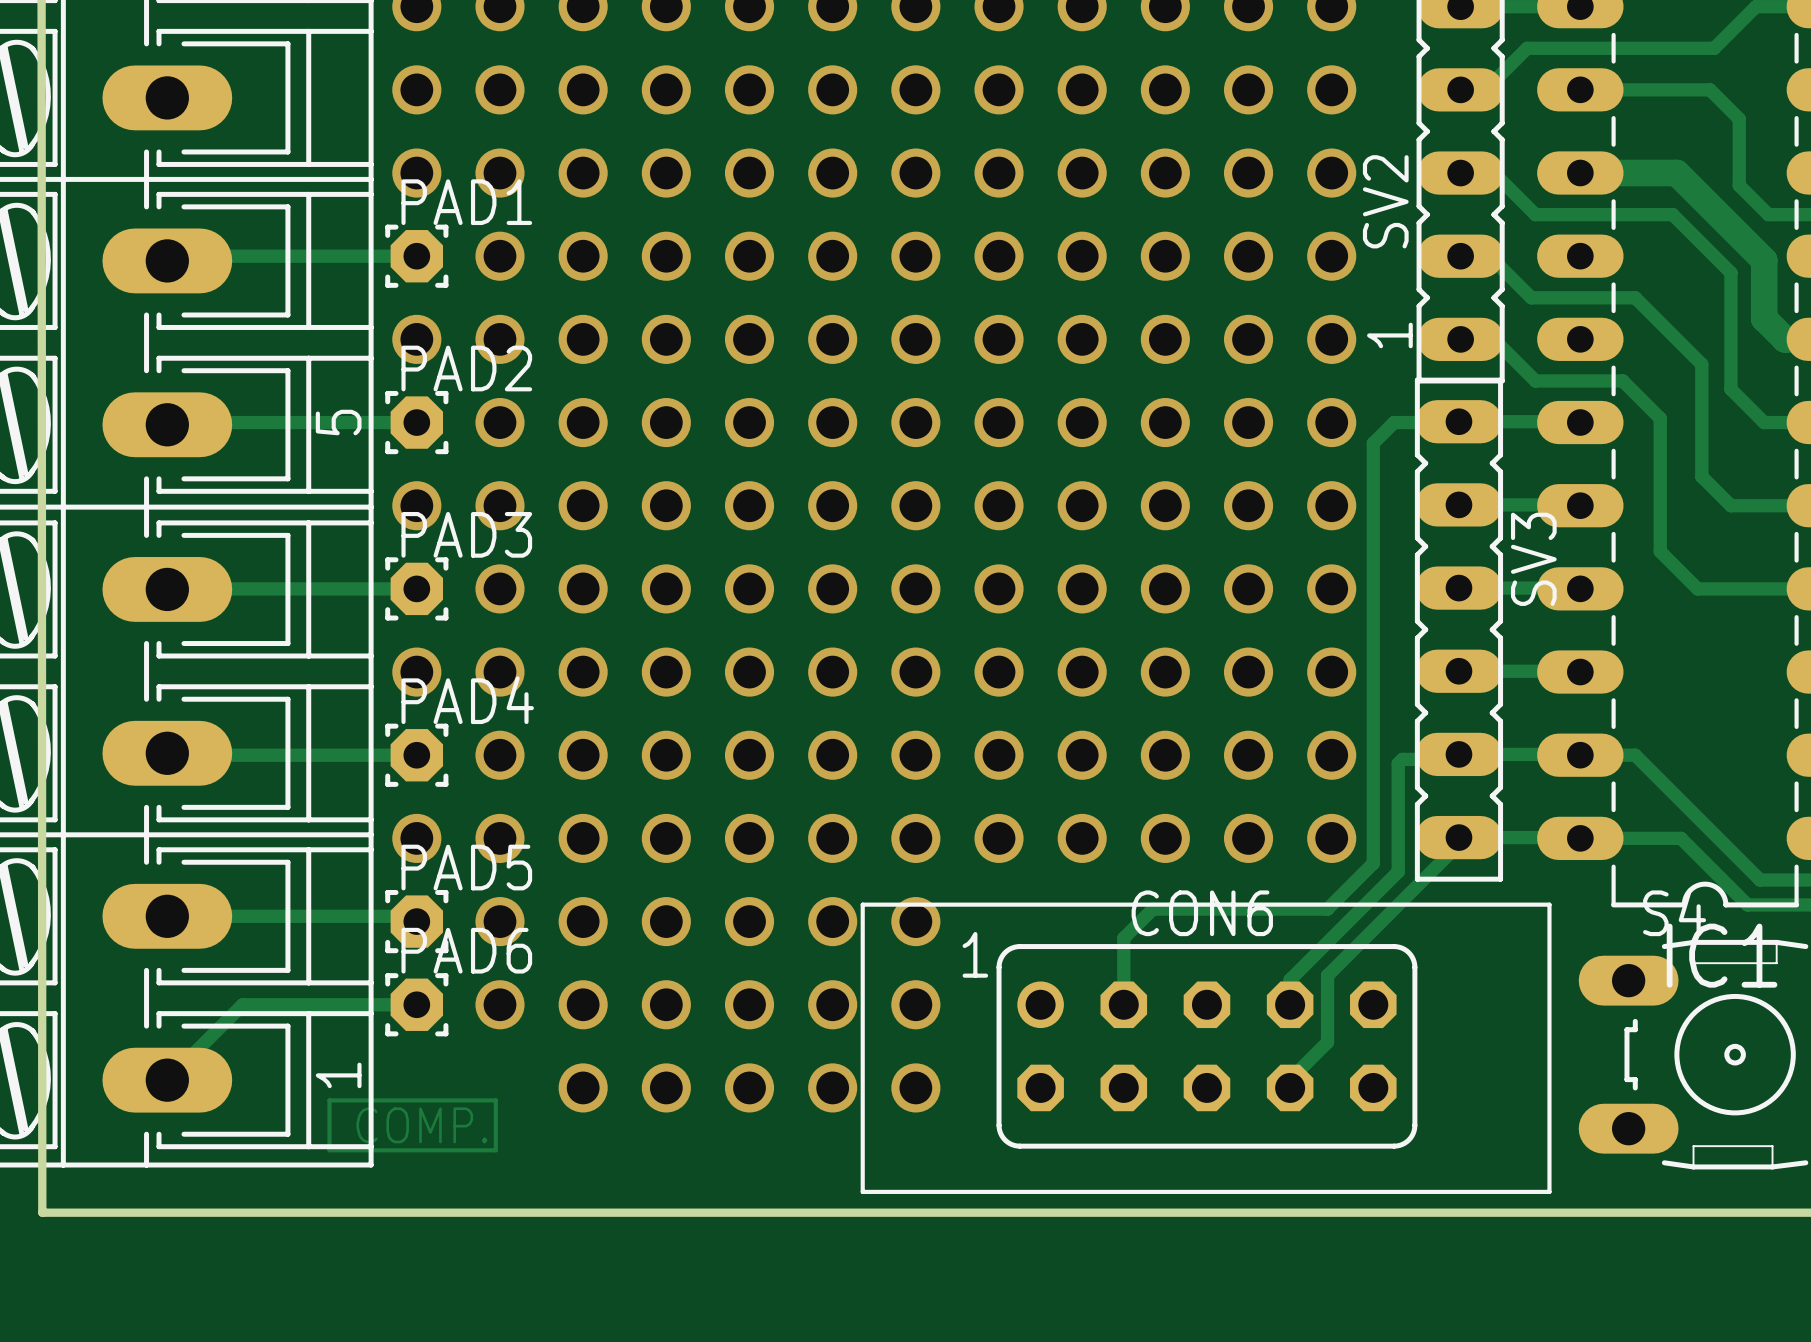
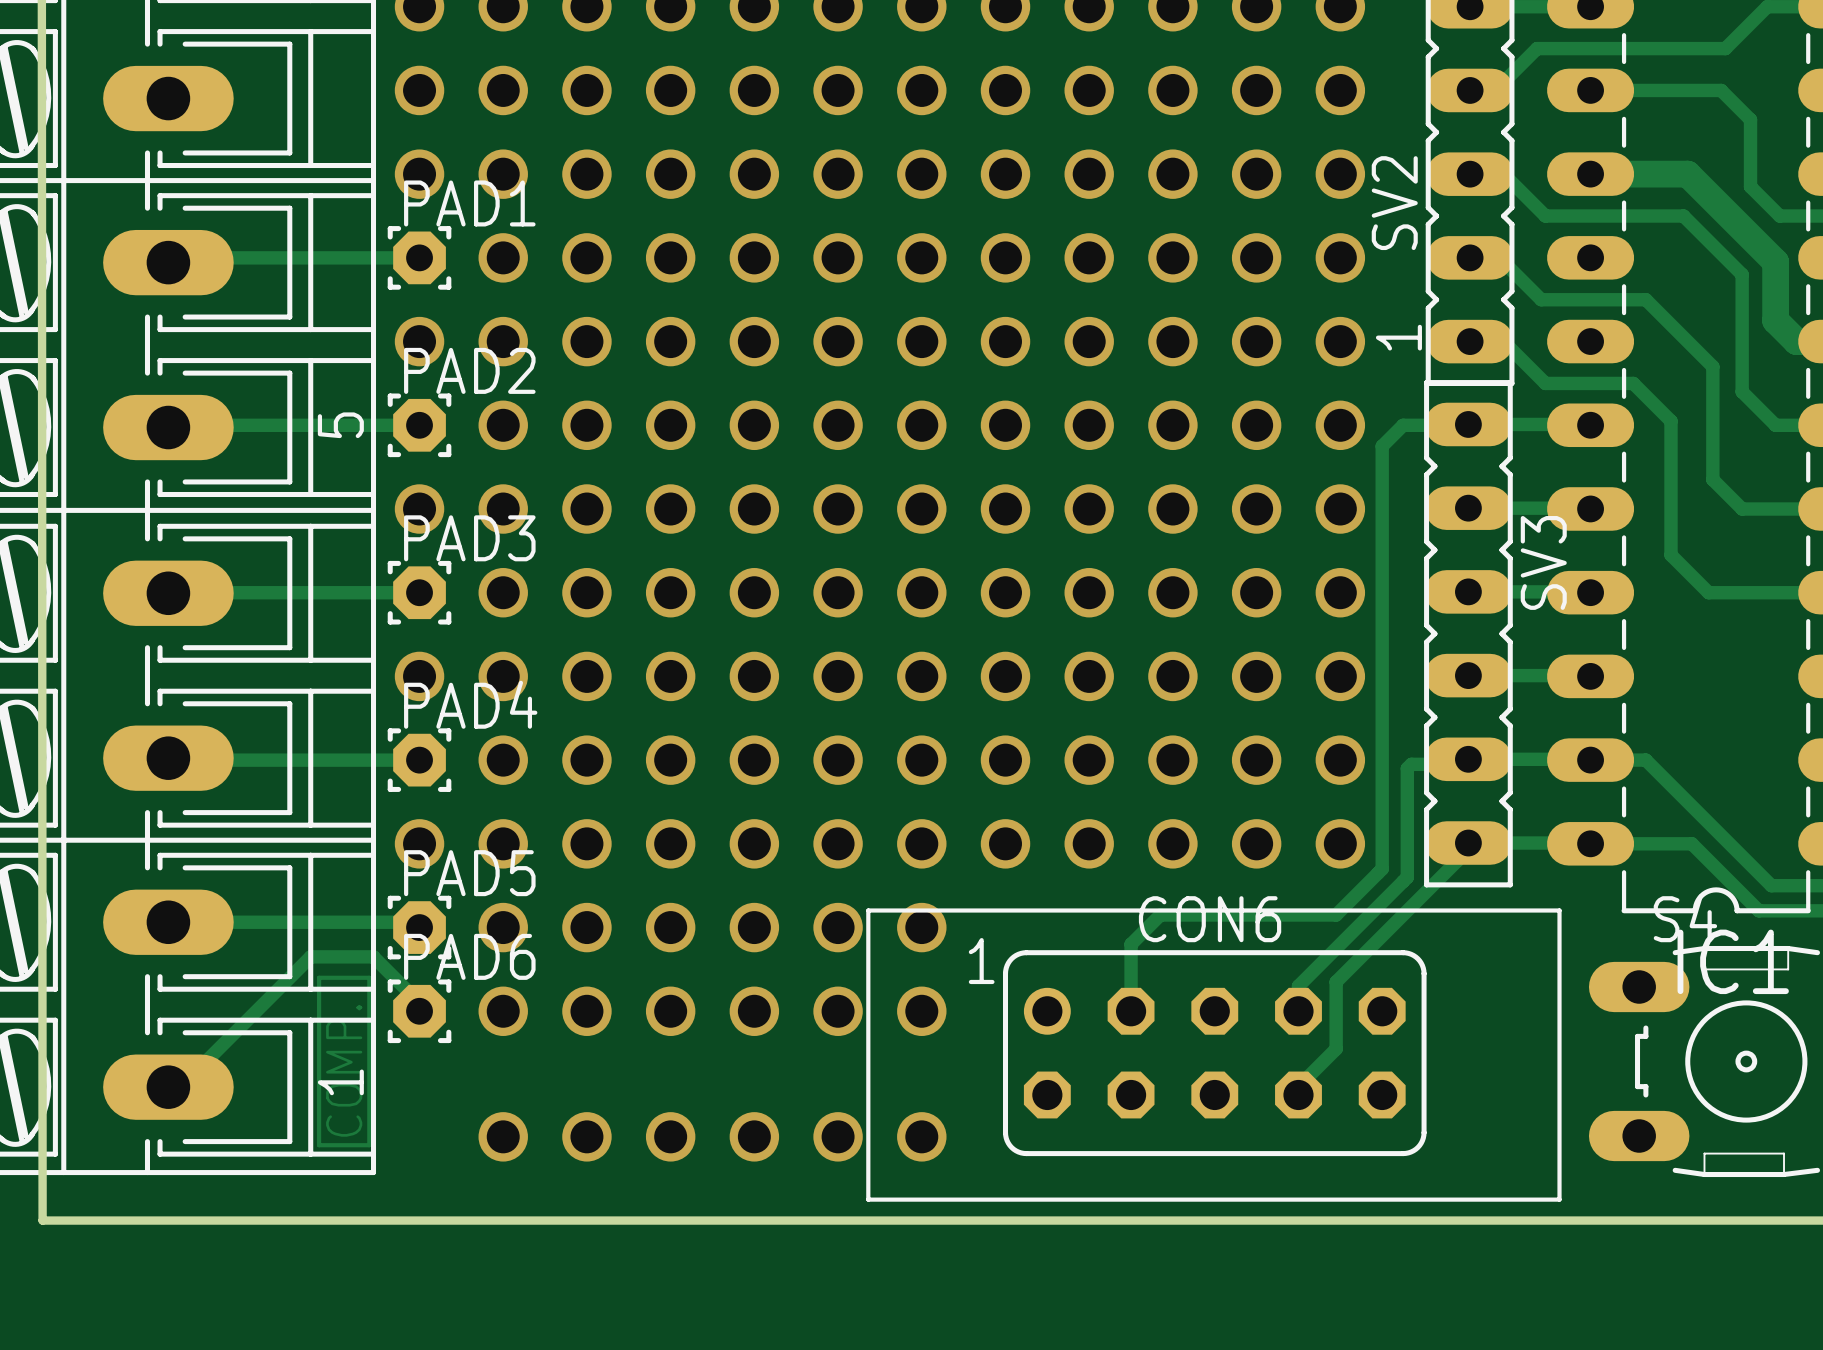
drawing: none -> [316, 975, 372, 1148]
track: (416, 1004) (242, 1004) (176, 1071) -> (419, 1011) (419, 1002) (373, 956) (310, 956) (189, 1078) (177, 1078)
via position: (583, 1087) -> (586, 1136)
via position: (666, 1087) -> (670, 1136)
via position: (749, 1087) -> (754, 1136)
via position: (832, 1087) -> (838, 1136)
via position: (915, 1087) -> (921, 1136)
drawing: [327, 1098, 498, 1153] -> none
via: none -> (503, 1136)

